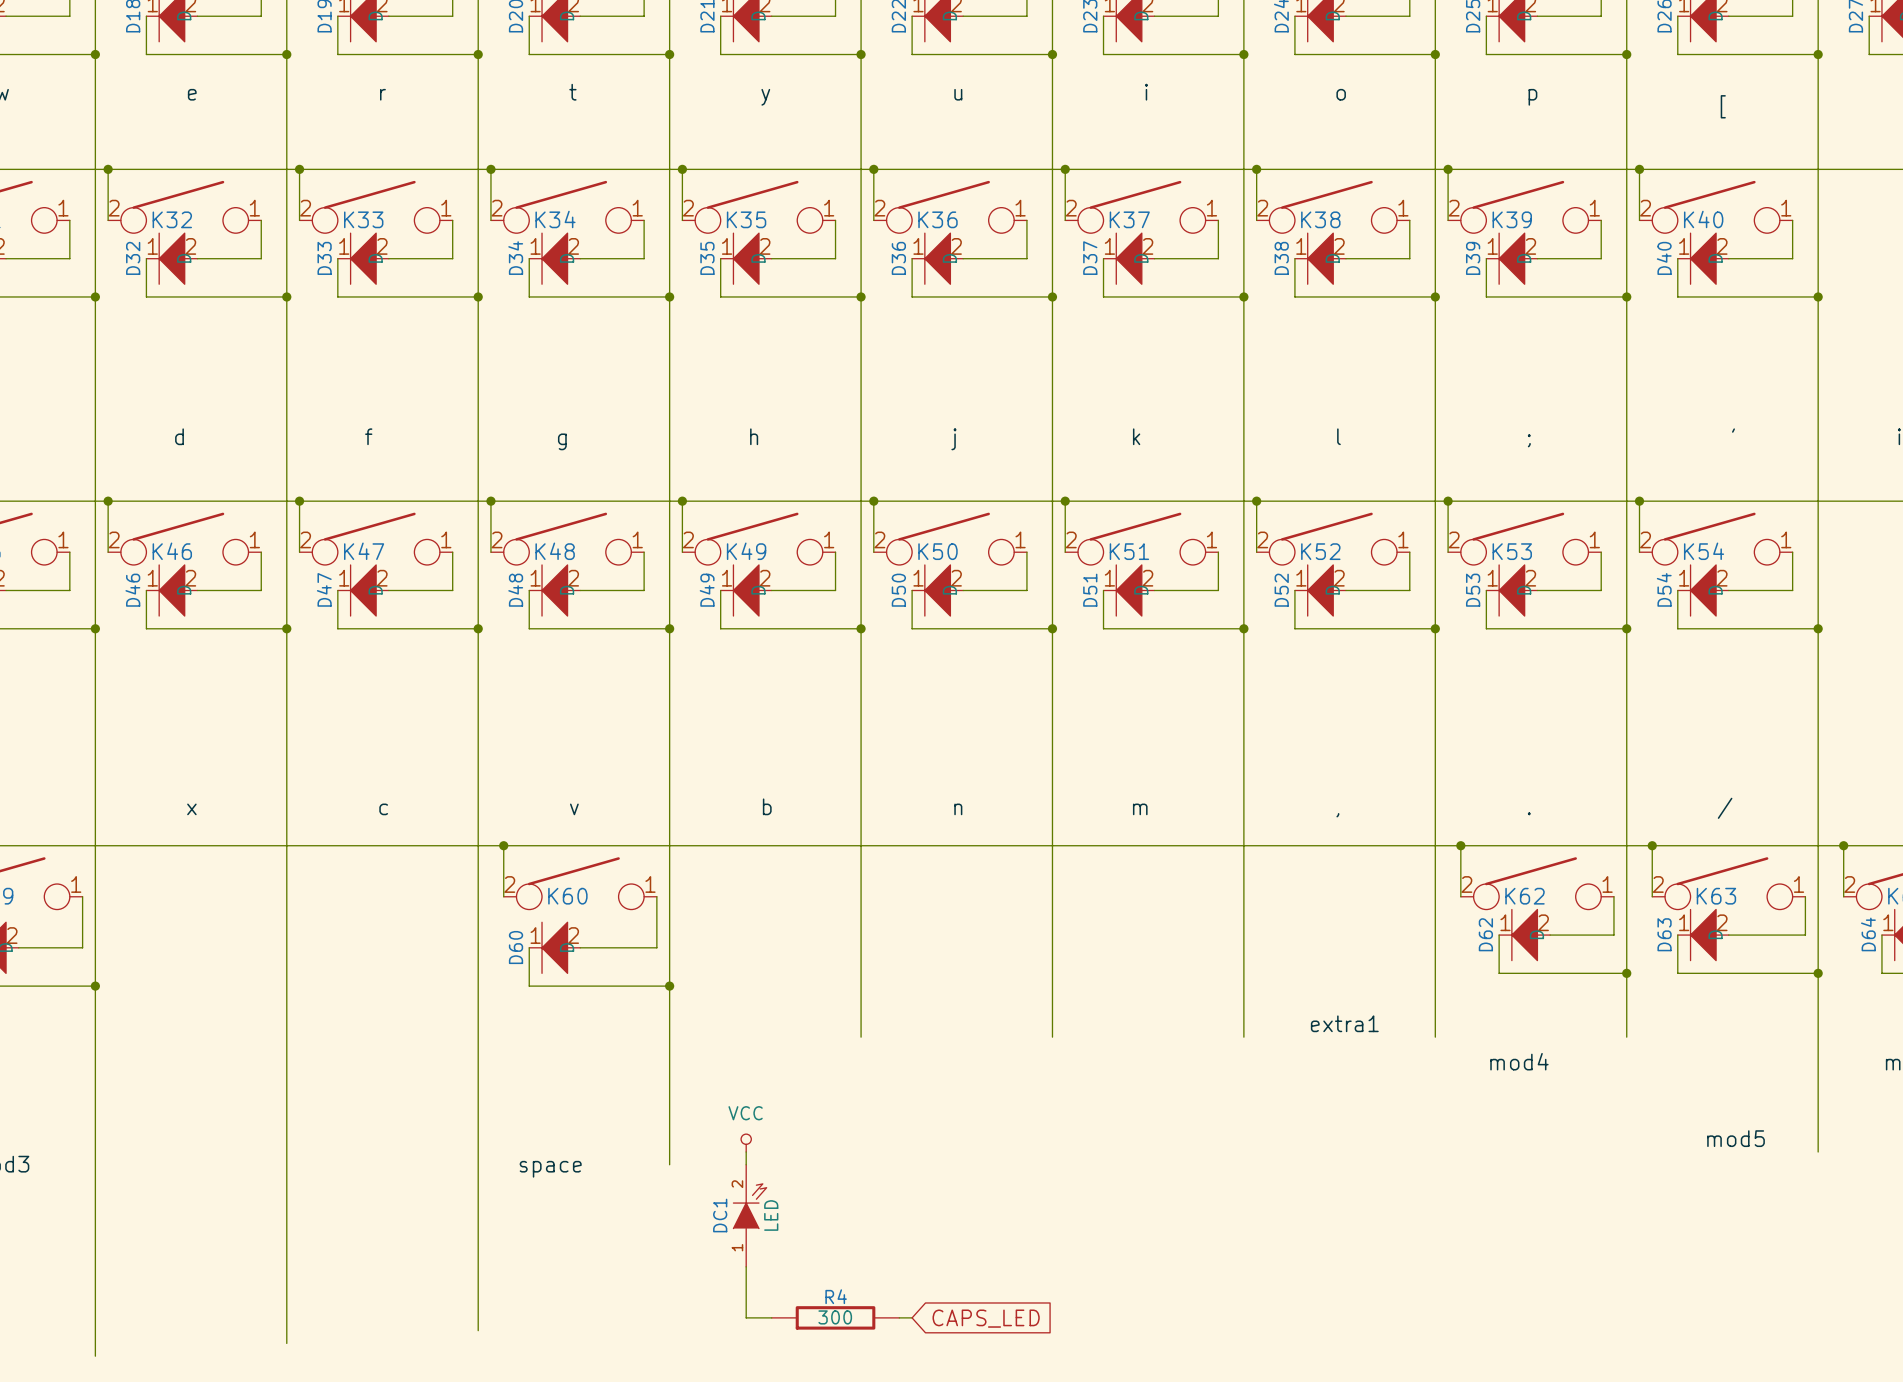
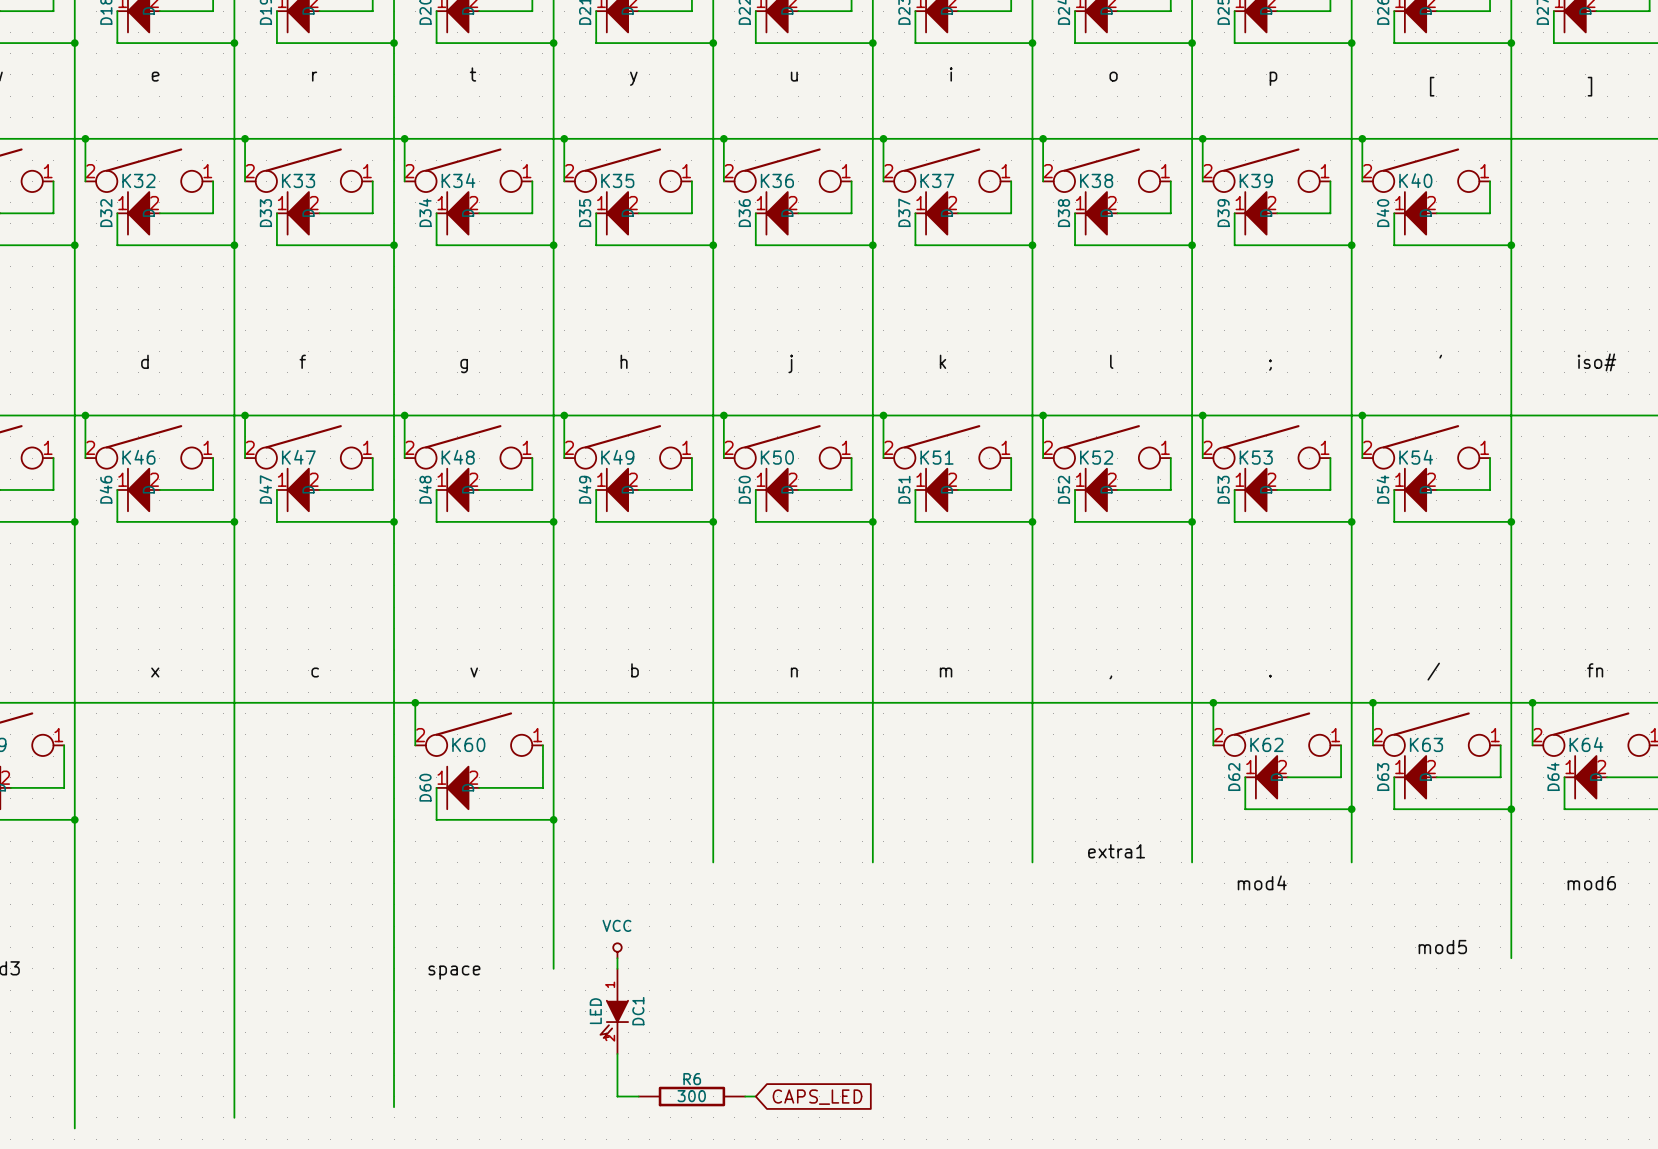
DC1 rotation: 0° (750, 1206) -> 180° (614, 1019)
R4 name: R4 (836, 1296) -> R6 (692, 1079)

